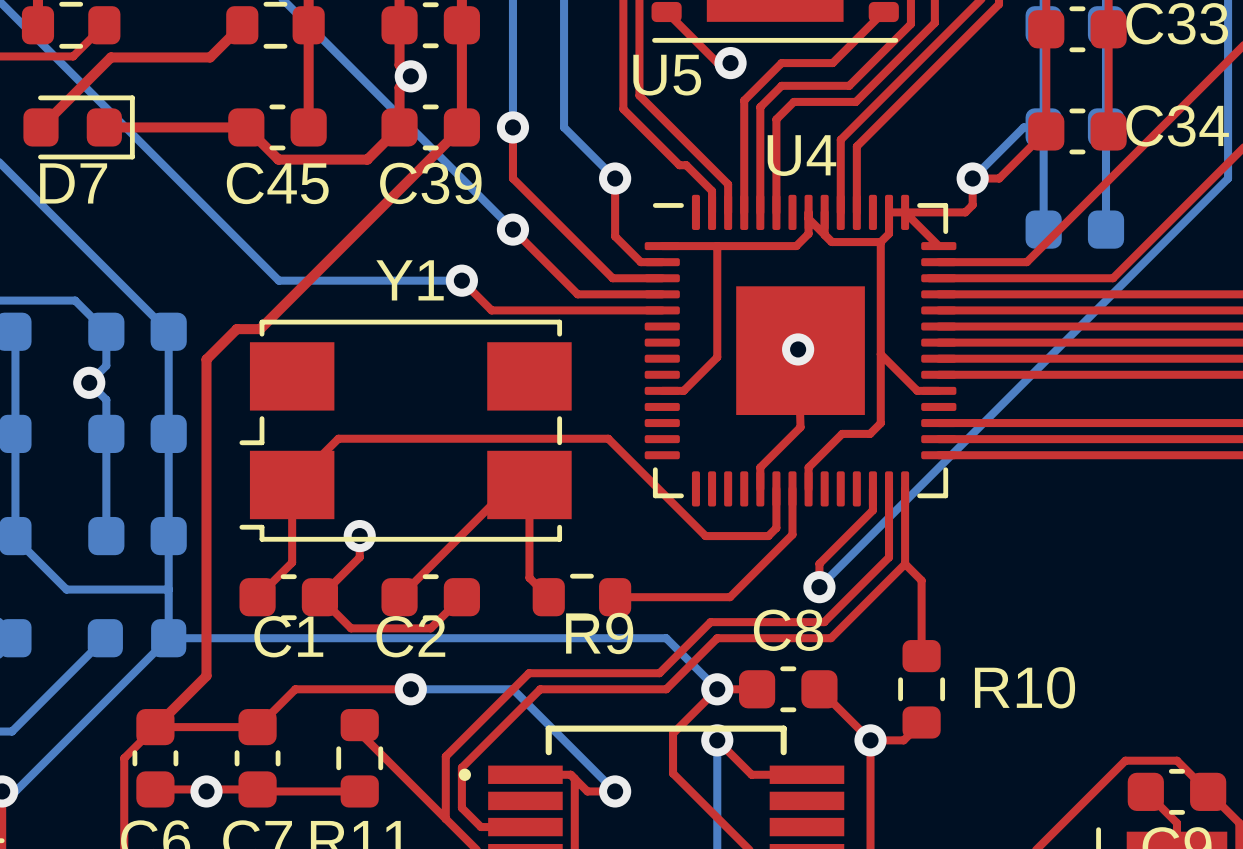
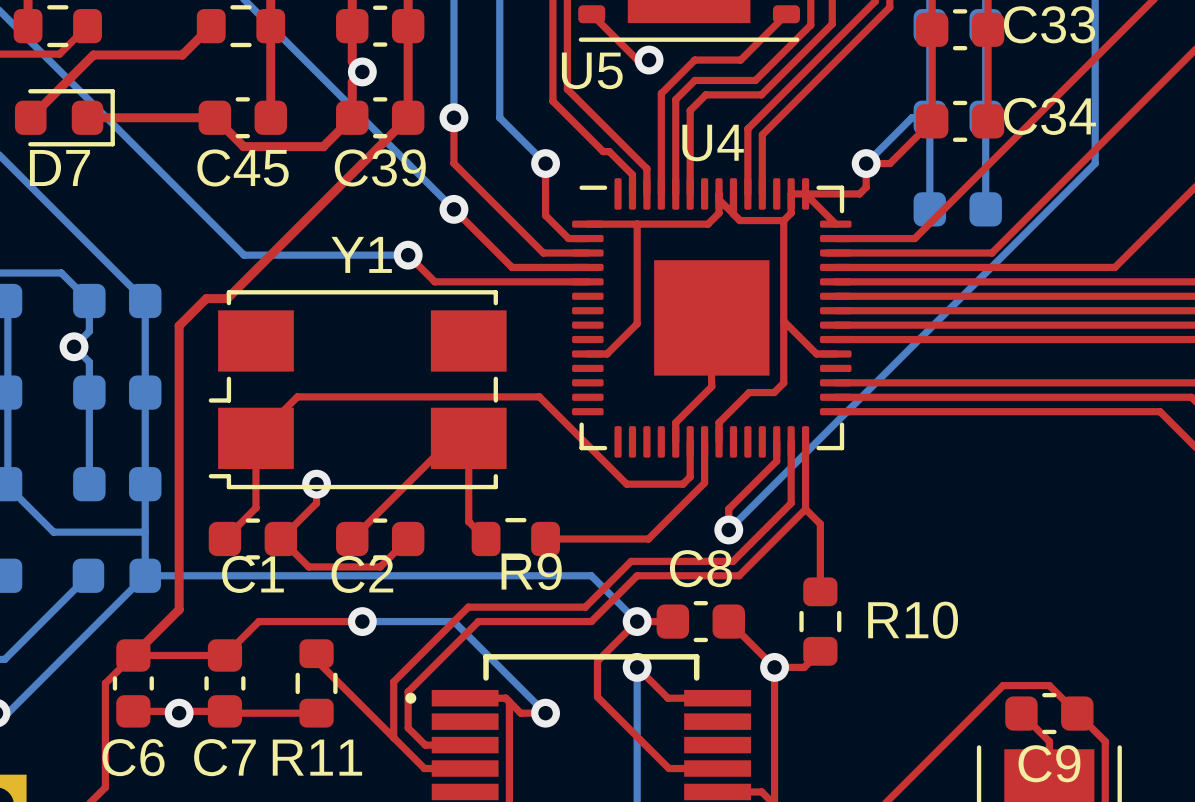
via: (798, 349) -> none

